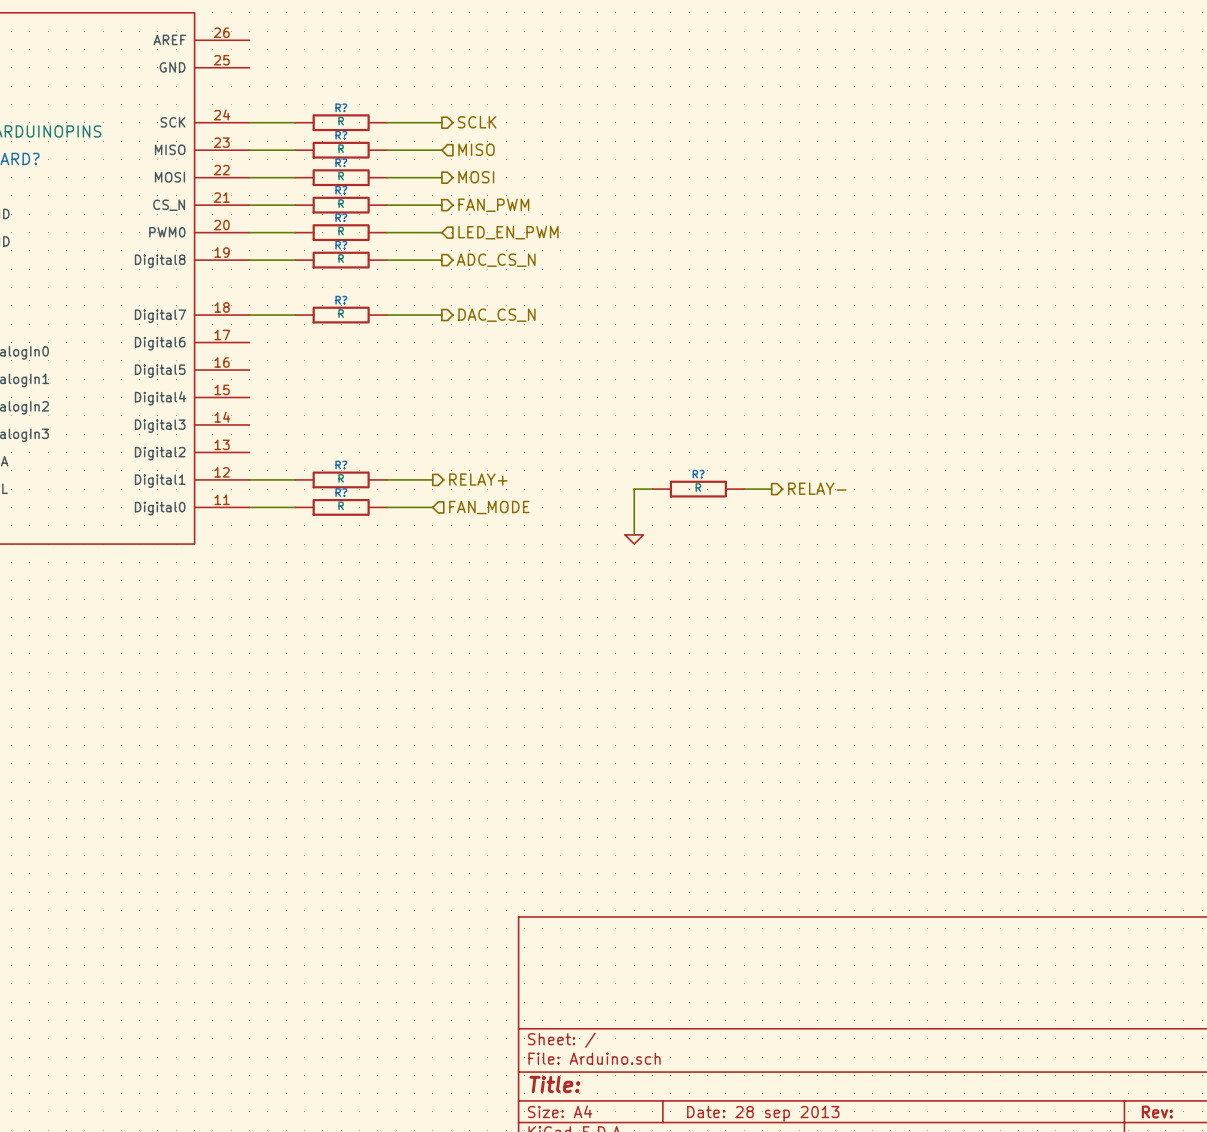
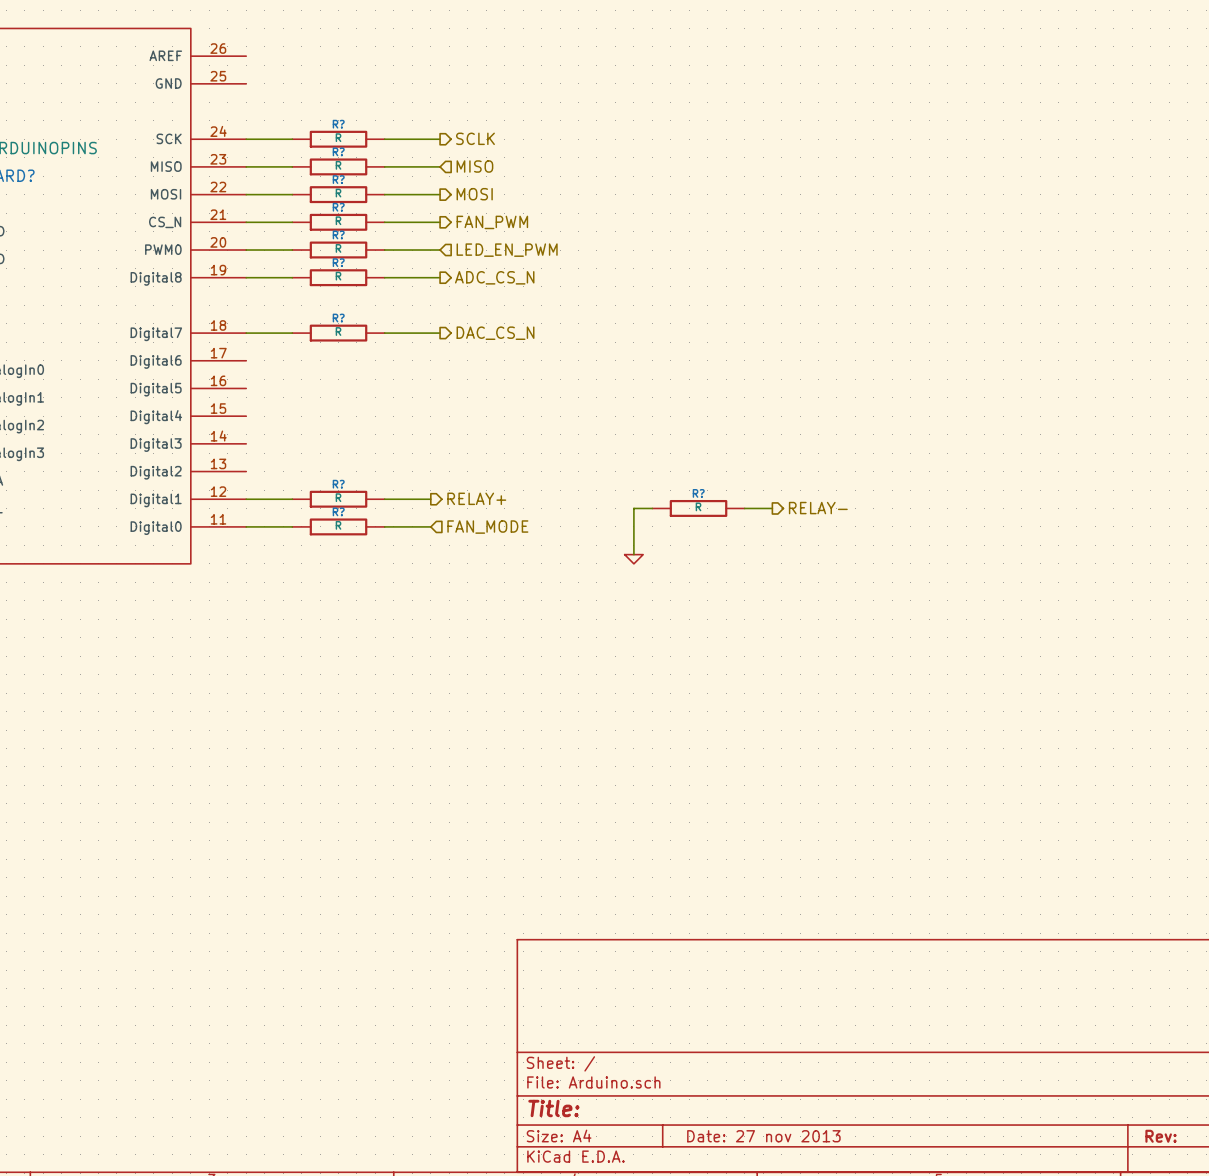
title block: Date: 28 sep 2013 (763, 1113) -> Date: 27 nov 2013 (763, 1136)

